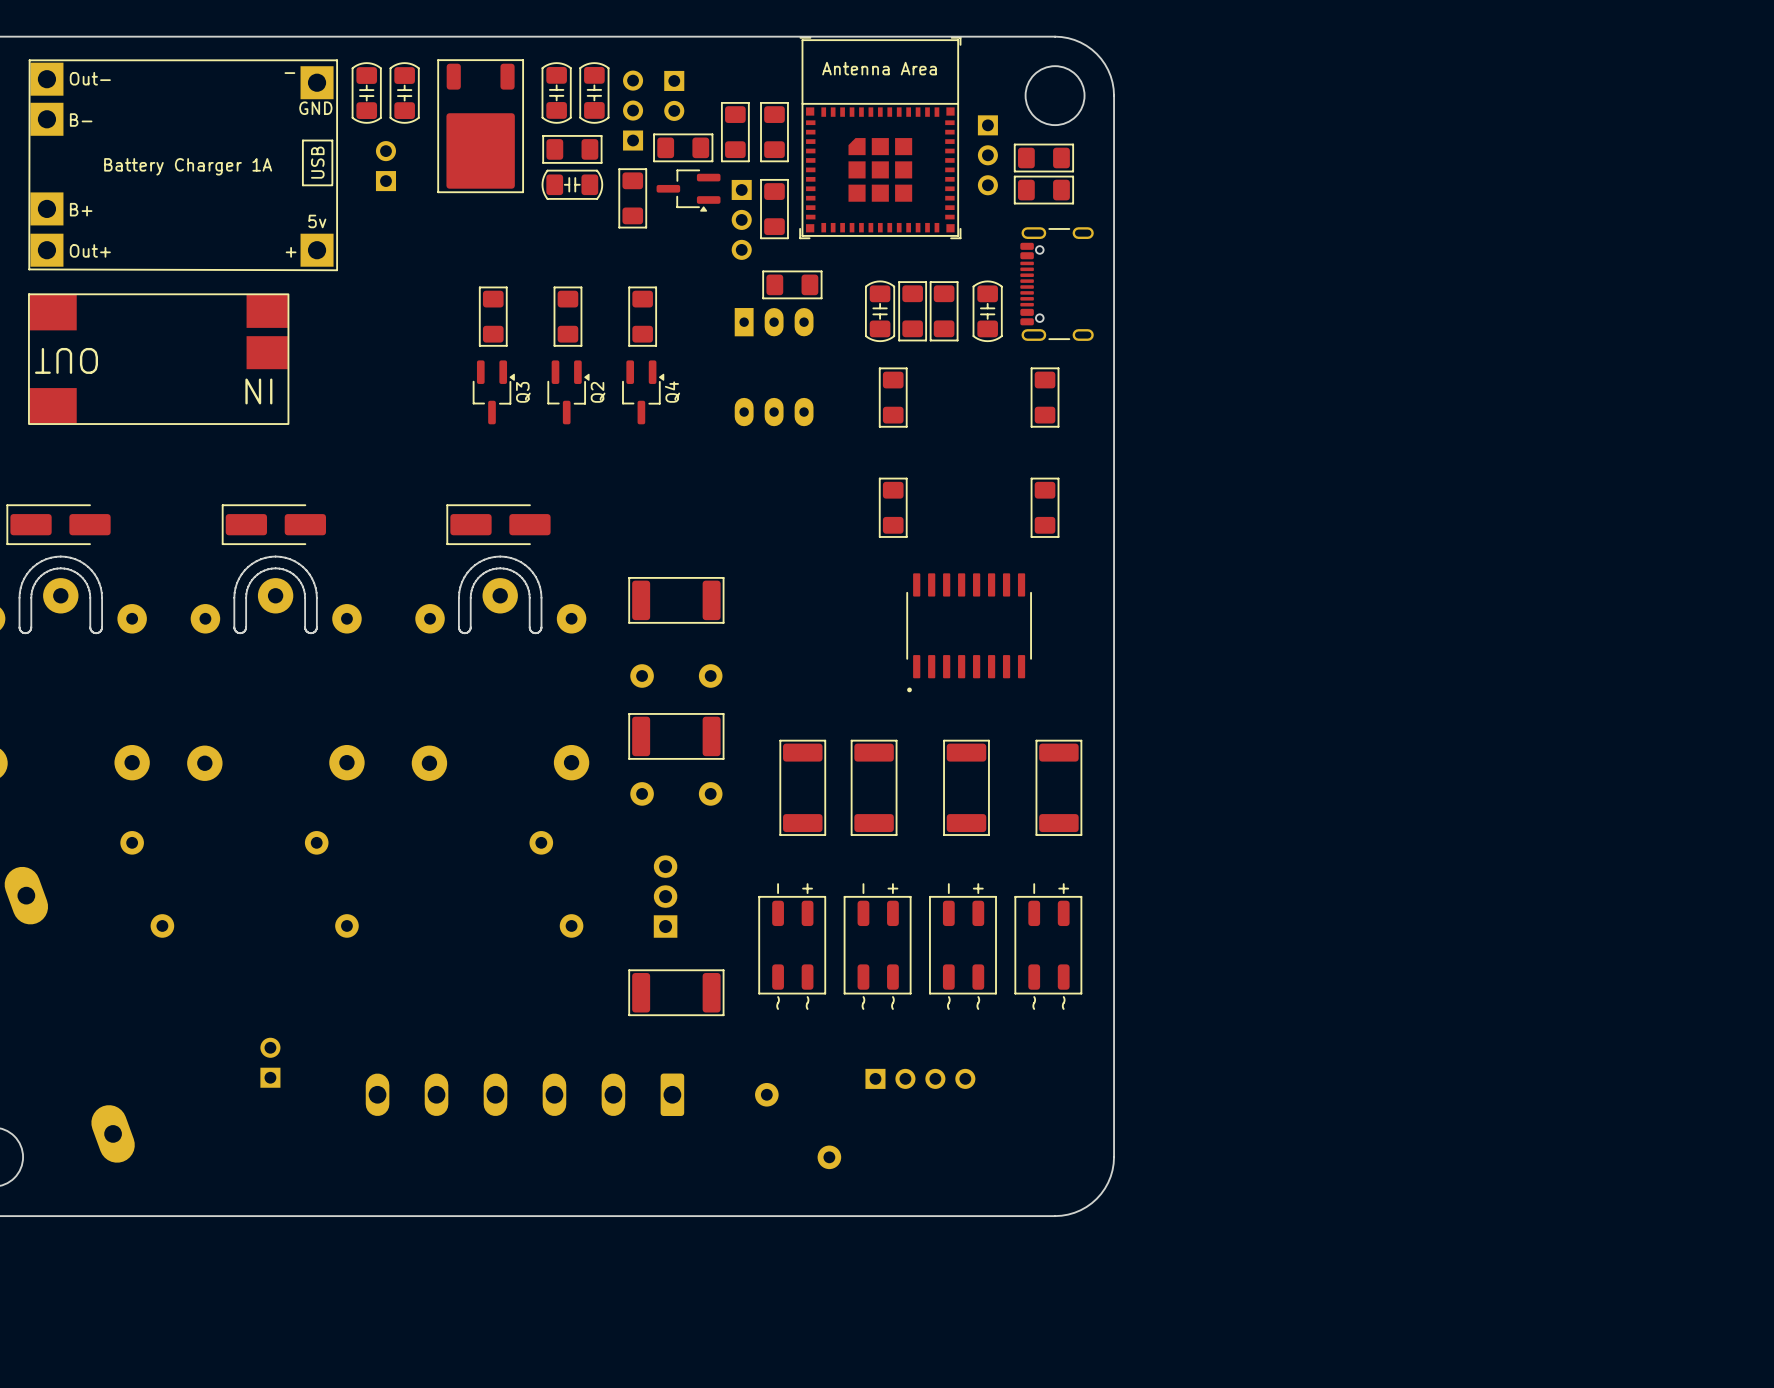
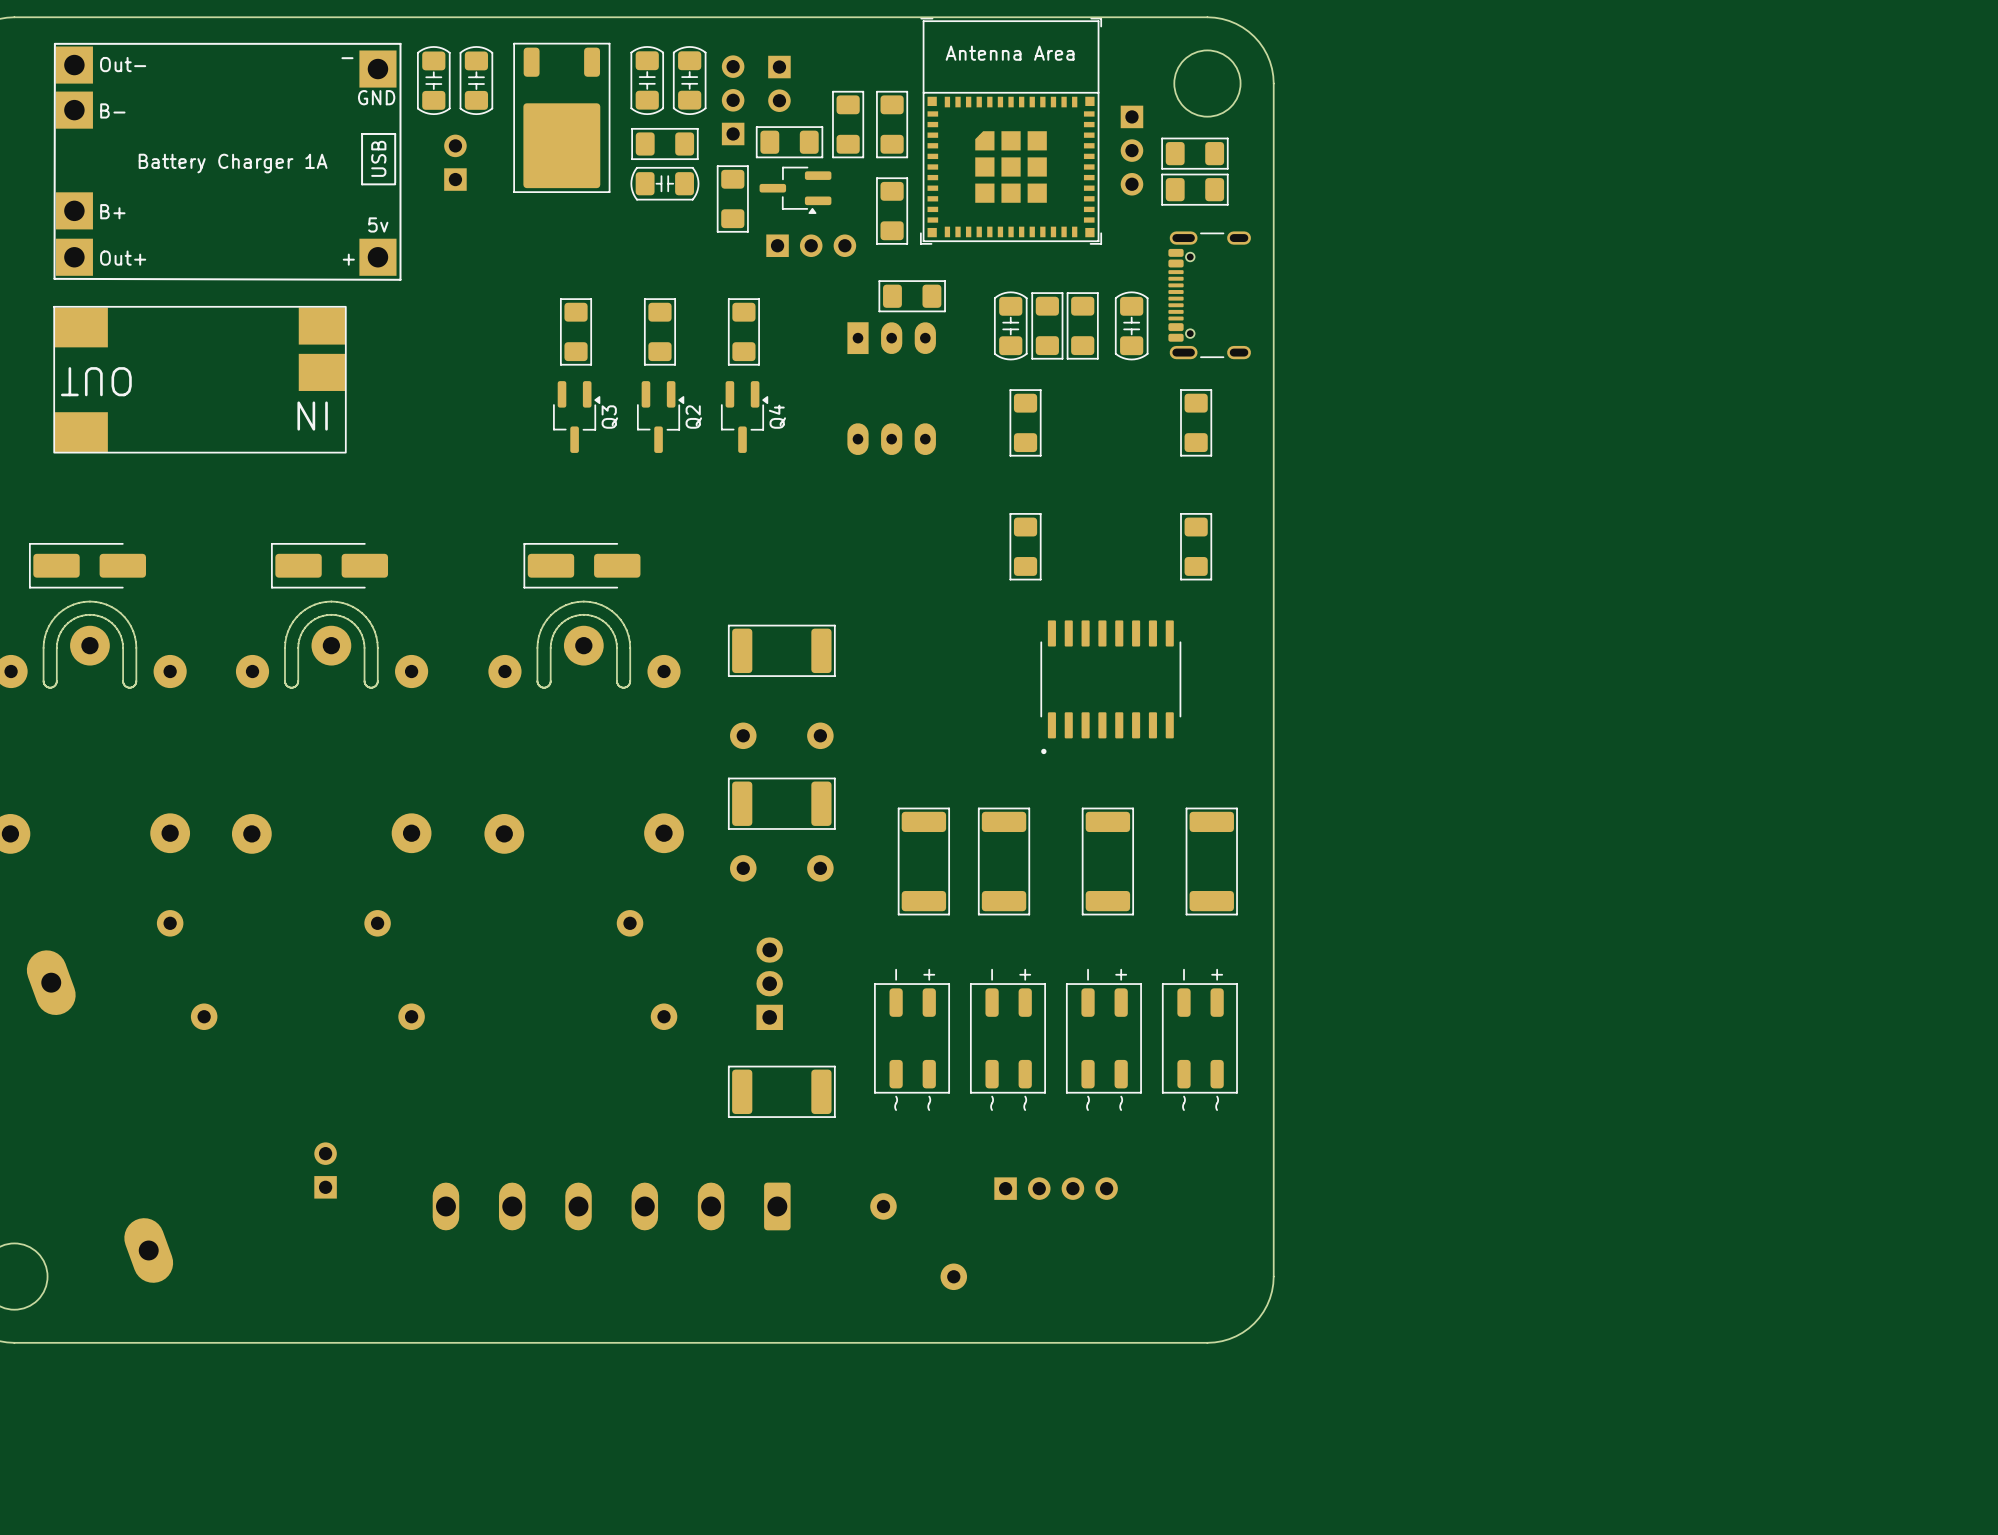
part rotation: 0° (741, 219) -> 90° counterclockwise (811, 245)

